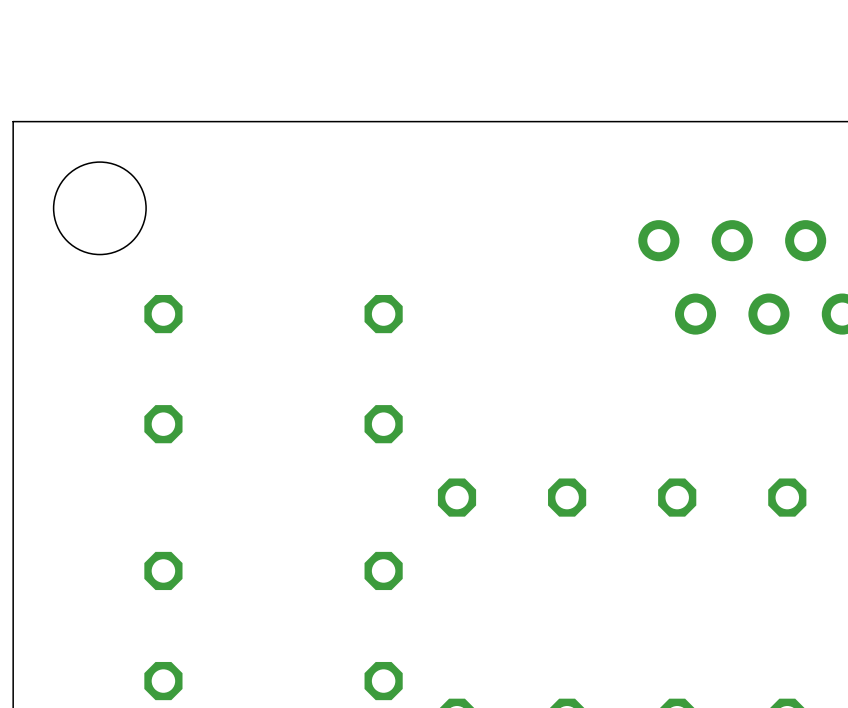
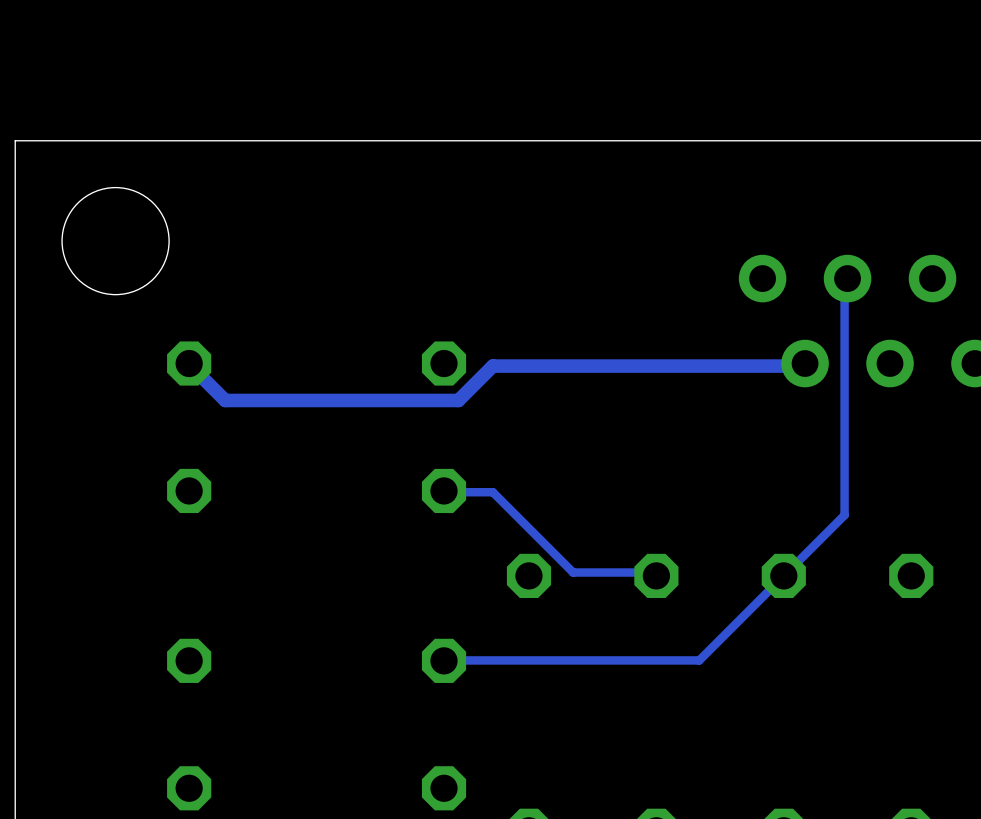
track: none -> (847, 278) (844, 281) (844, 515) (699, 660) (444, 660)
track: none -> (805, 363) (802, 366) (492, 366) (458, 400) (225, 400) (189, 363)
track: none -> (444, 490) (492, 492) (573, 572) (653, 572) (656, 575)

